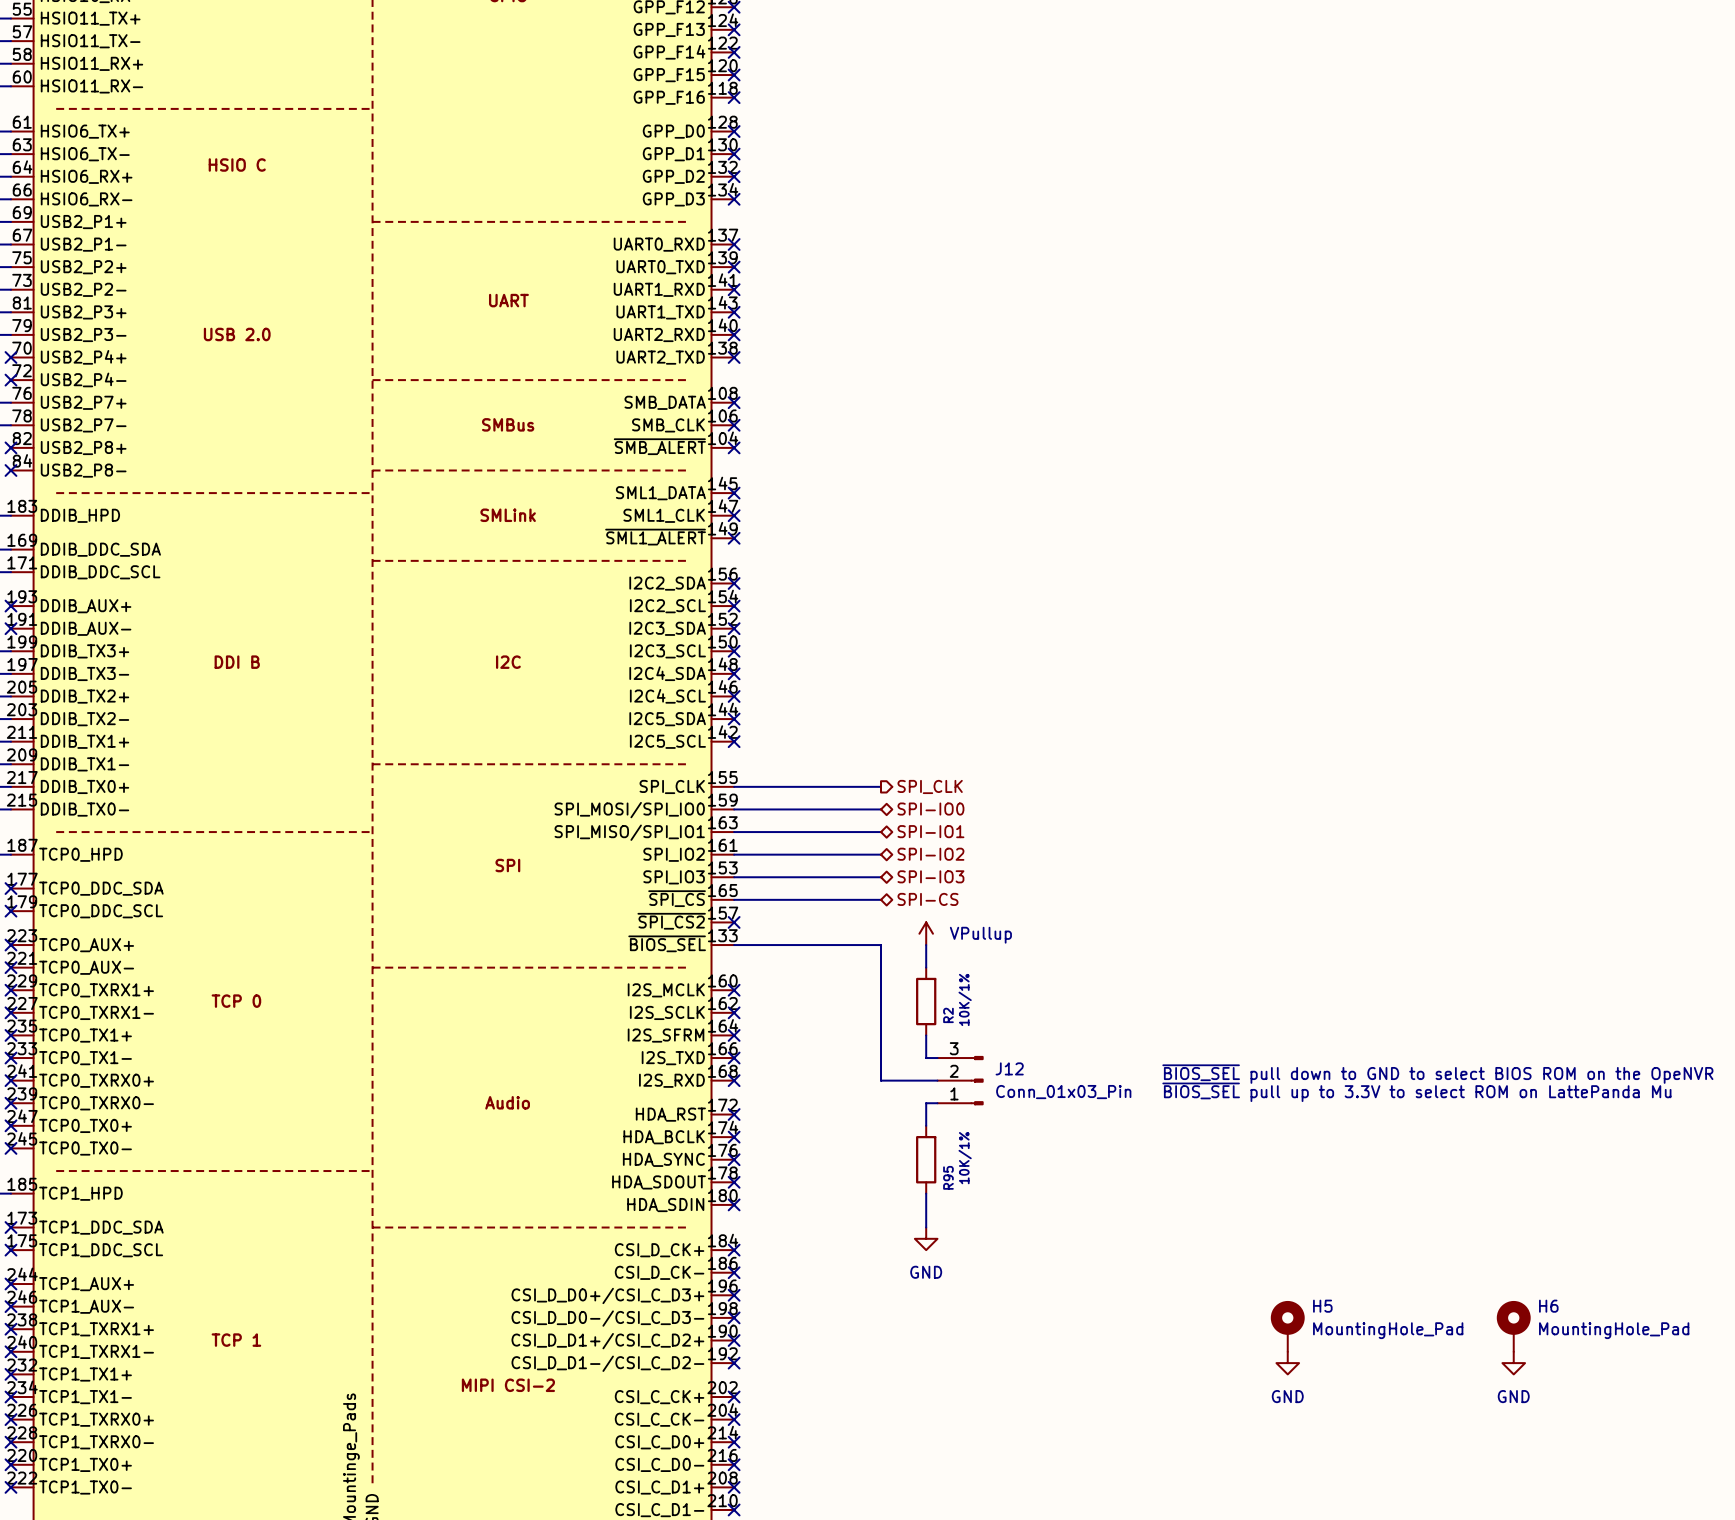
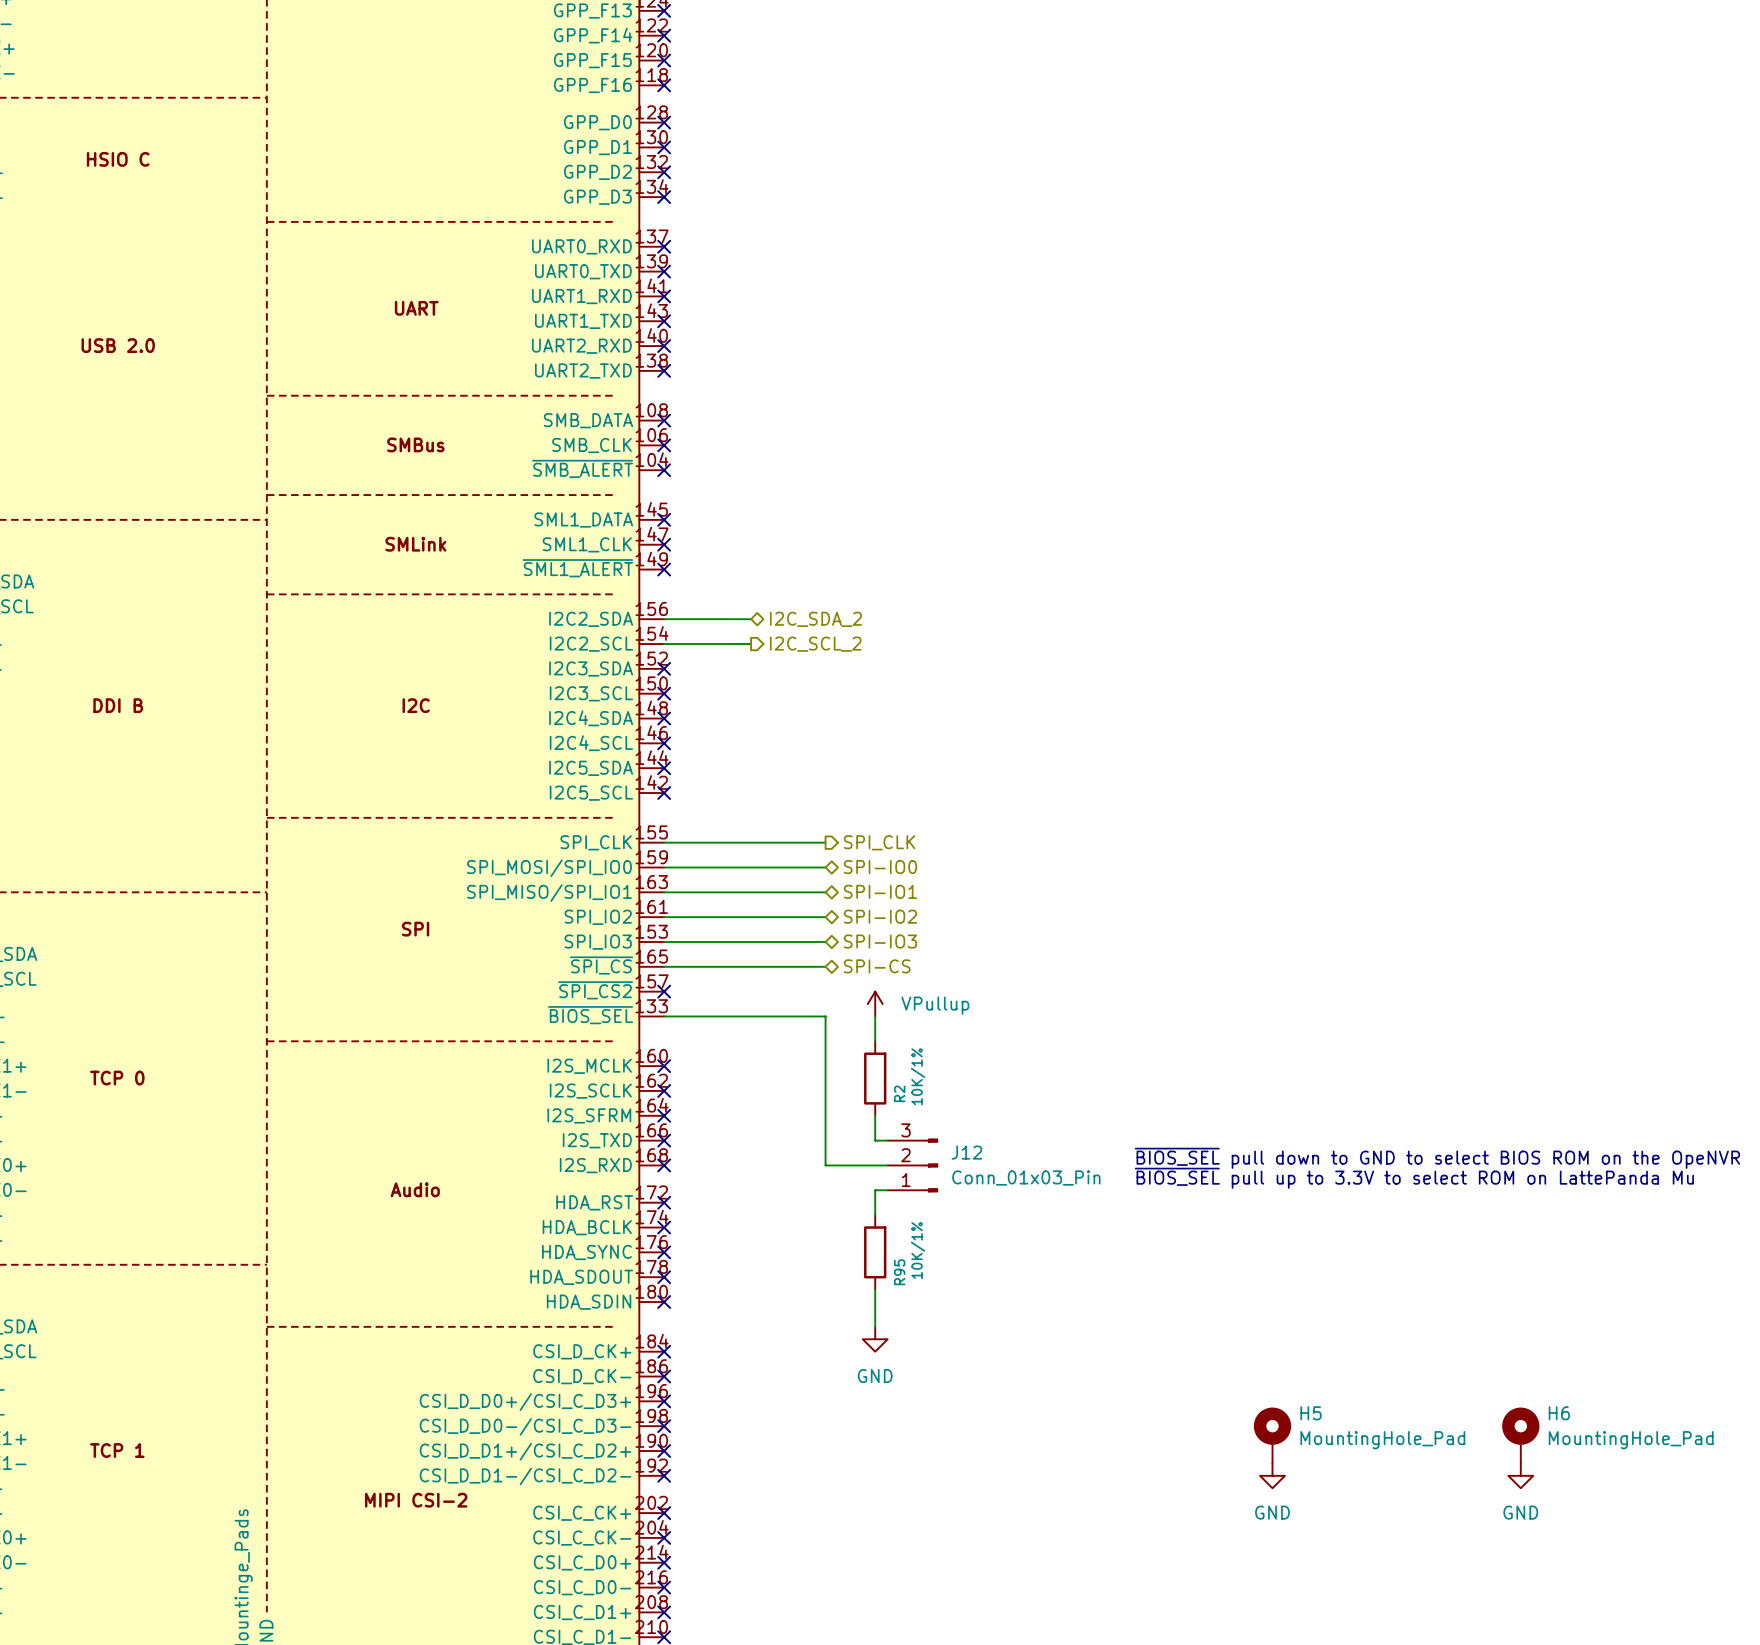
wire: none -> (664, 619) (751, 619)
no-connect mark: (734, 583) -> none
hierarchical label: none -> I2C_SDA_2 (815, 619)
wire: none -> (664, 644) (751, 644)
no-connect mark: (734, 606) -> none
hierarchical label: none -> I2C_SCL_2 (815, 644)

